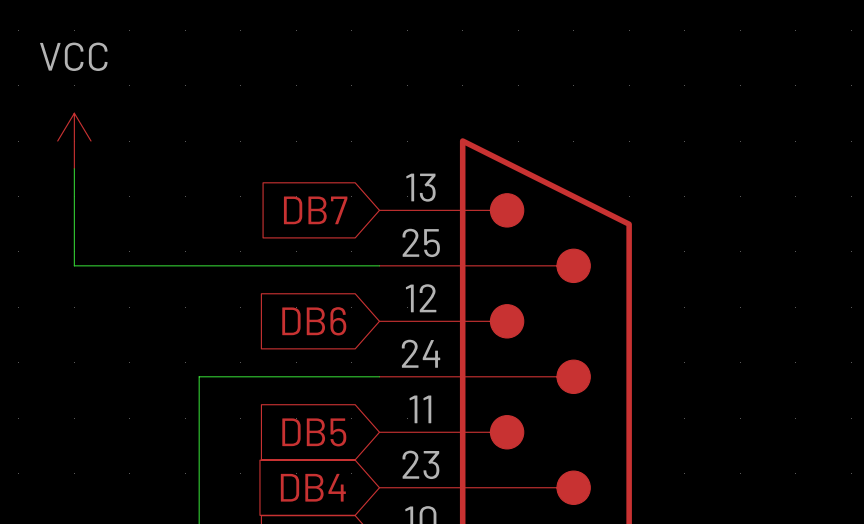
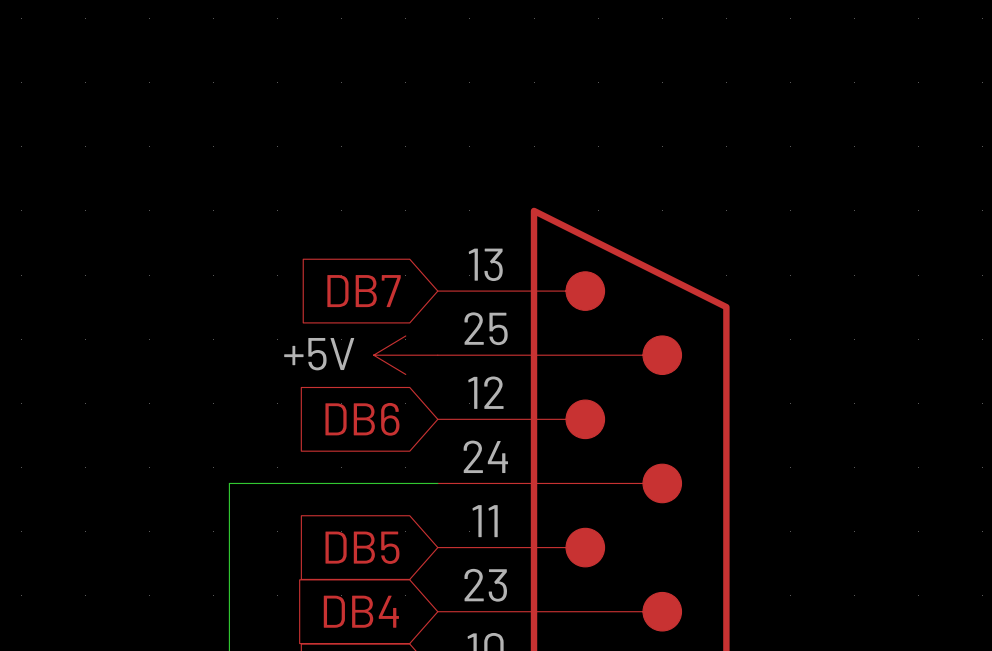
power symbol: VCC (74, 141) -> none
wire: (74, 168) (74, 265) (379, 265) -> none
power symbol: none -> +5V (405, 355)

